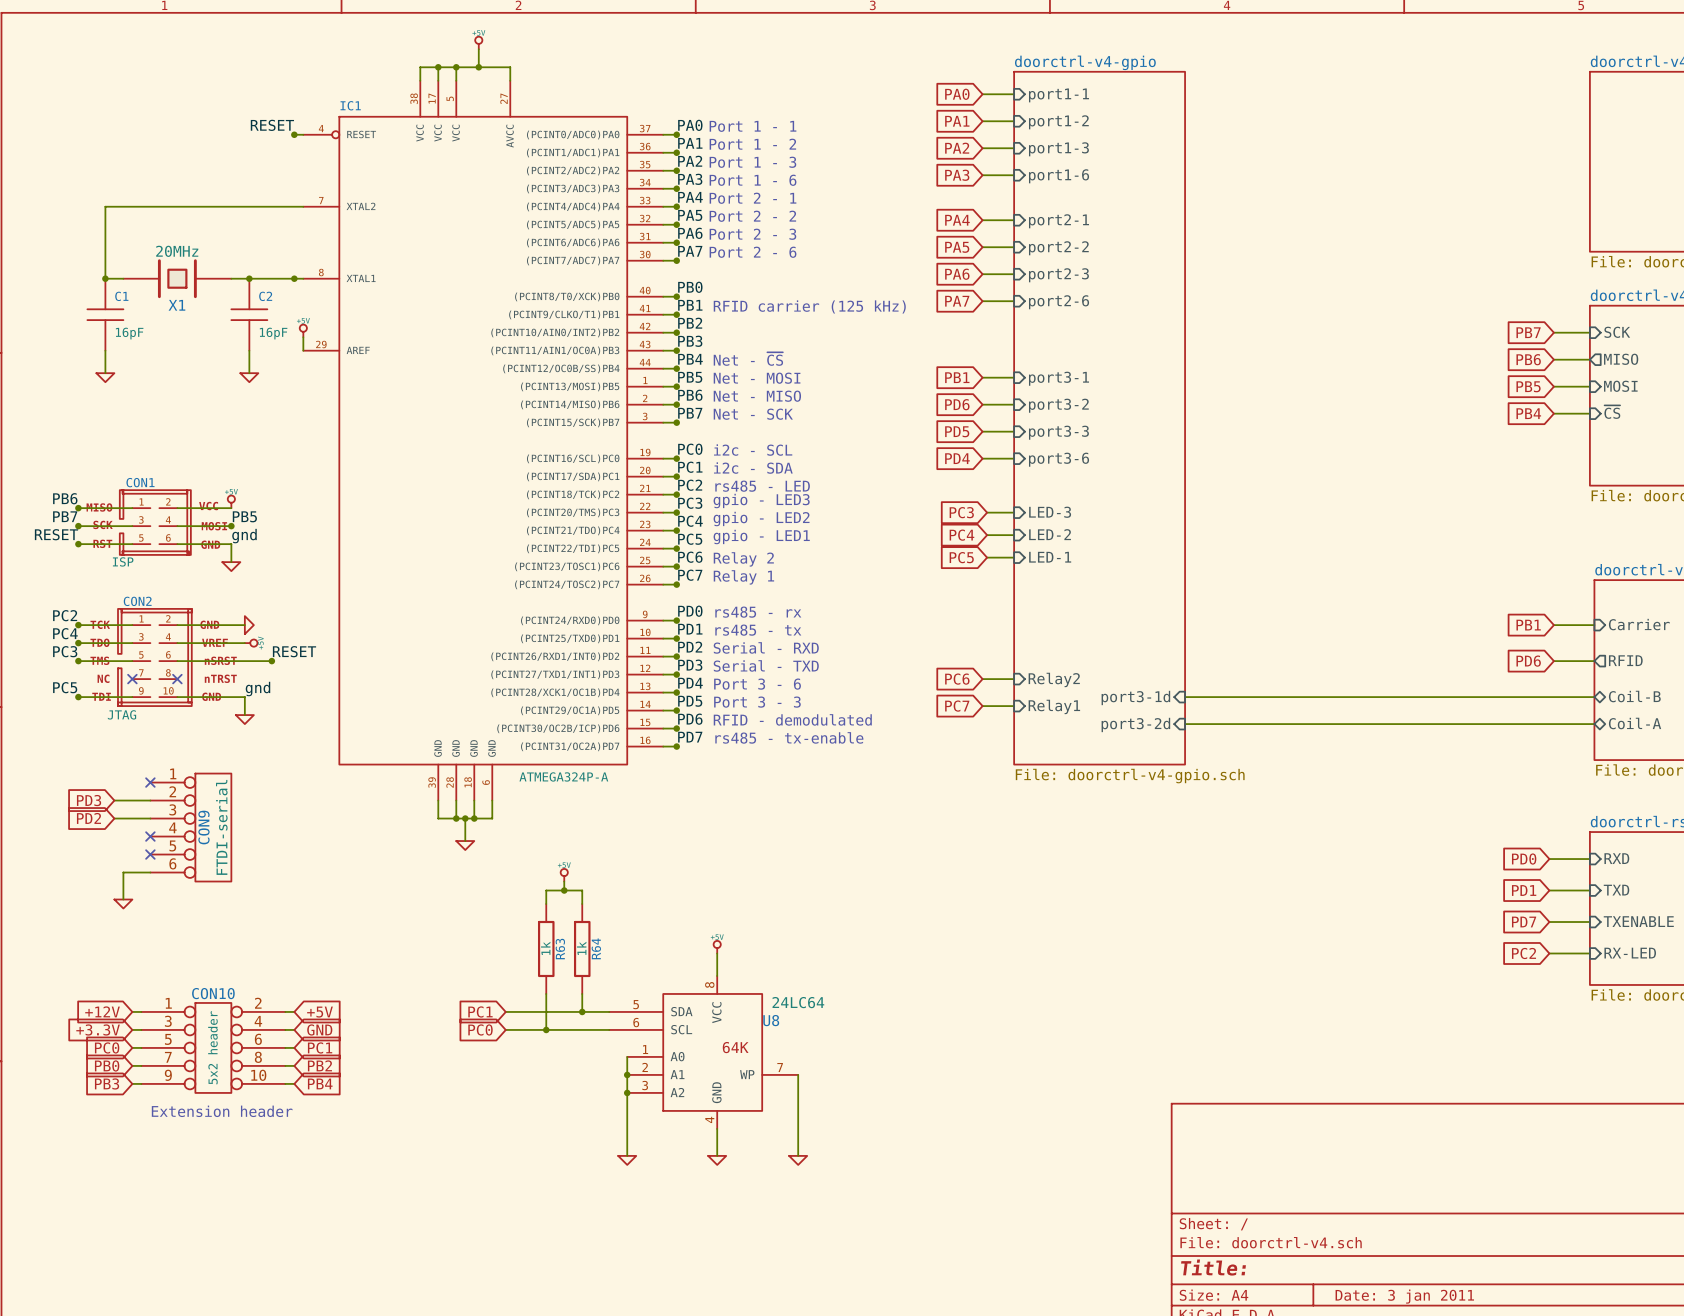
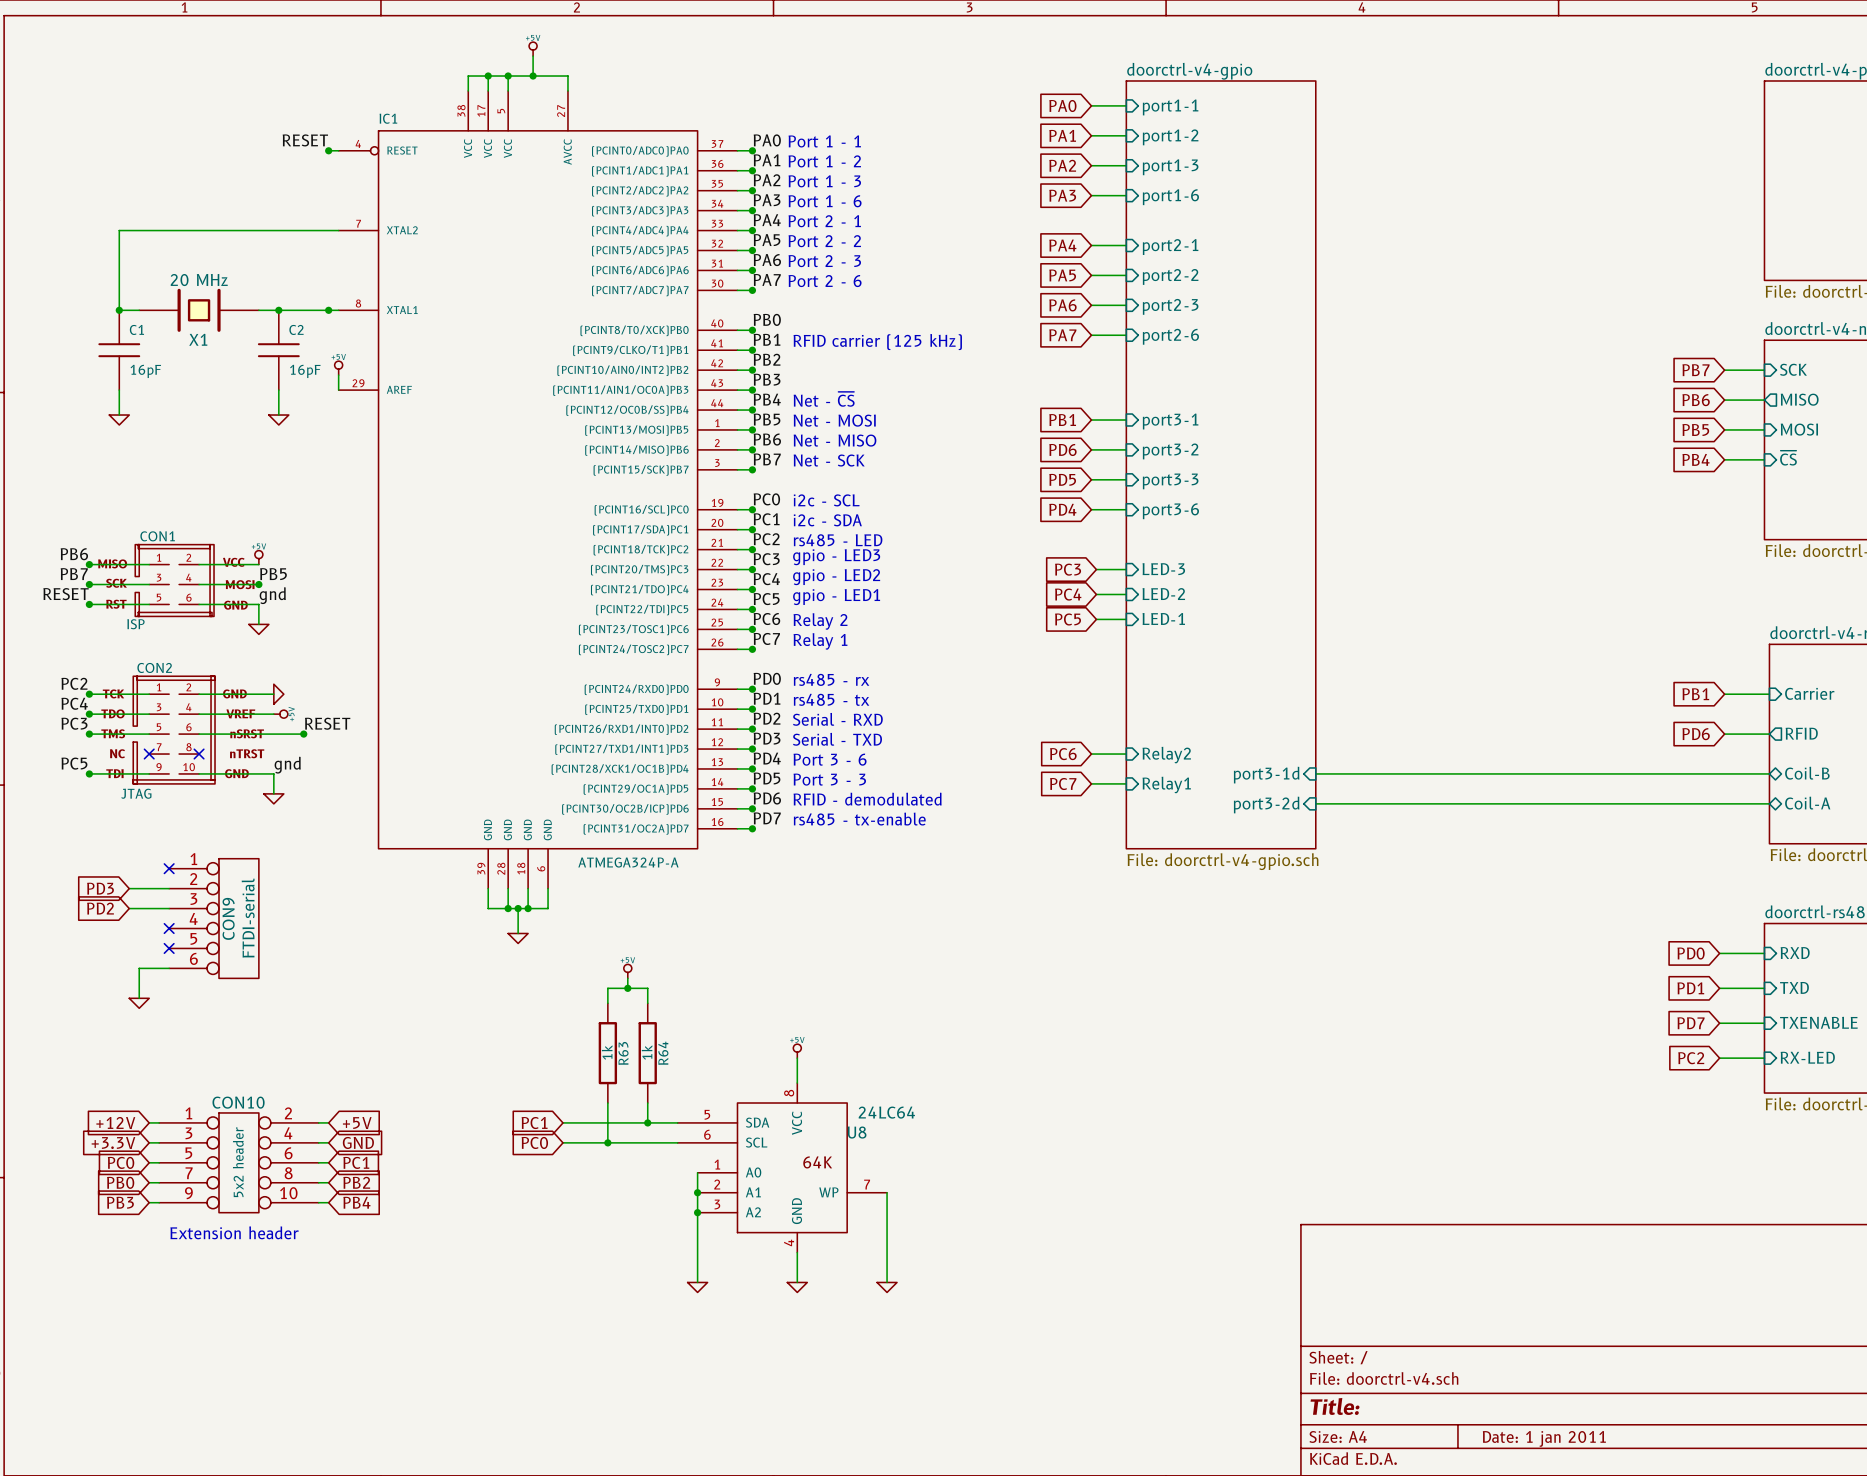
X1 value: 20MHz (177, 251) -> 20 MHz (199, 280)
title block: Date: 3 jan 2011 (1404, 1296) -> Date: 1 jan 2011 (1544, 1438)

